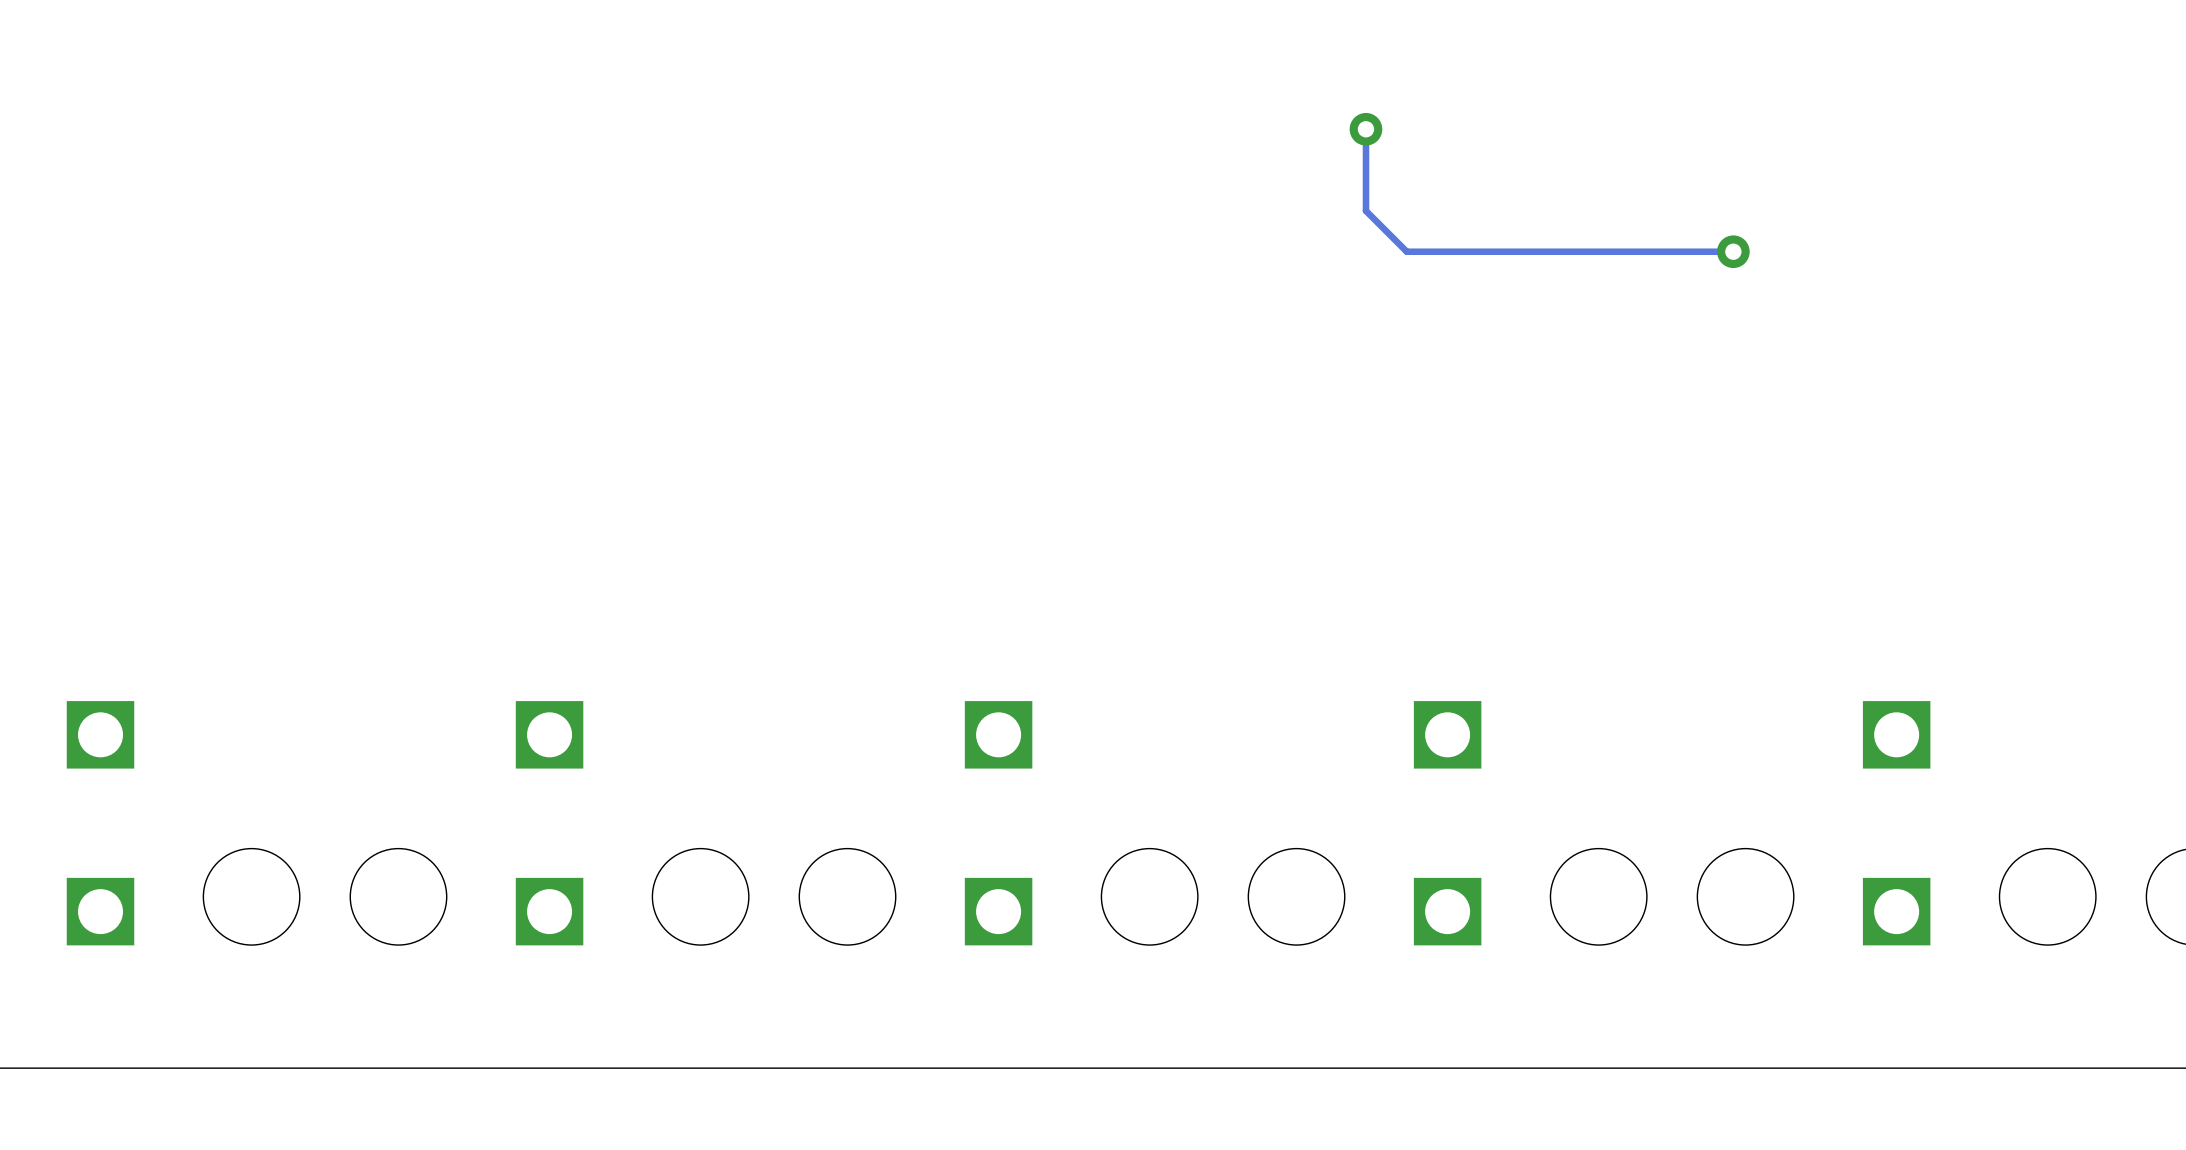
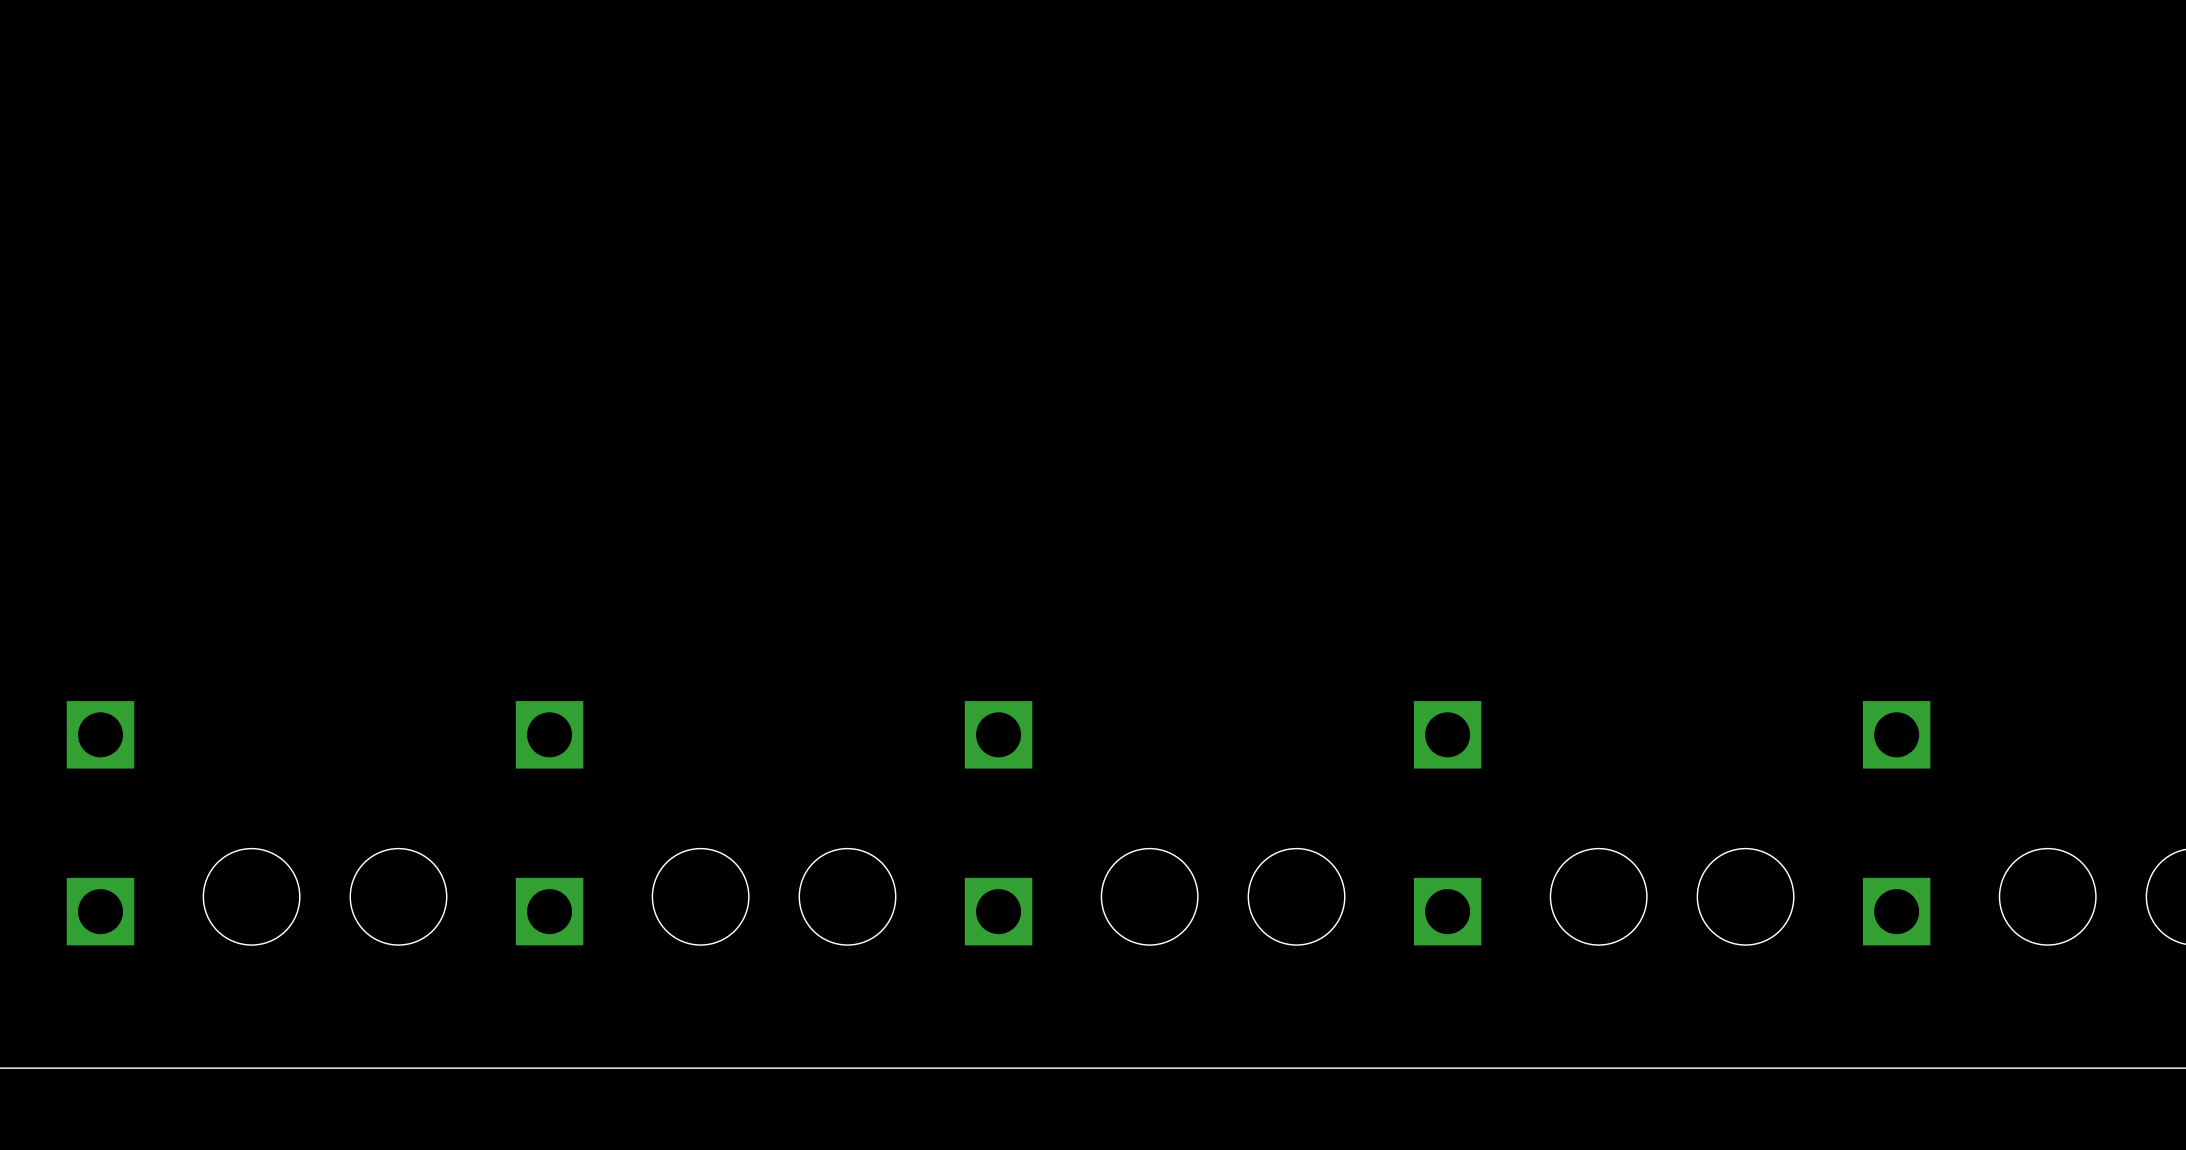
track: (1365, 129) (1365, 210) (1406, 251) (1733, 251) -> none
via: (1365, 129) -> none
via: (1733, 251) -> none

